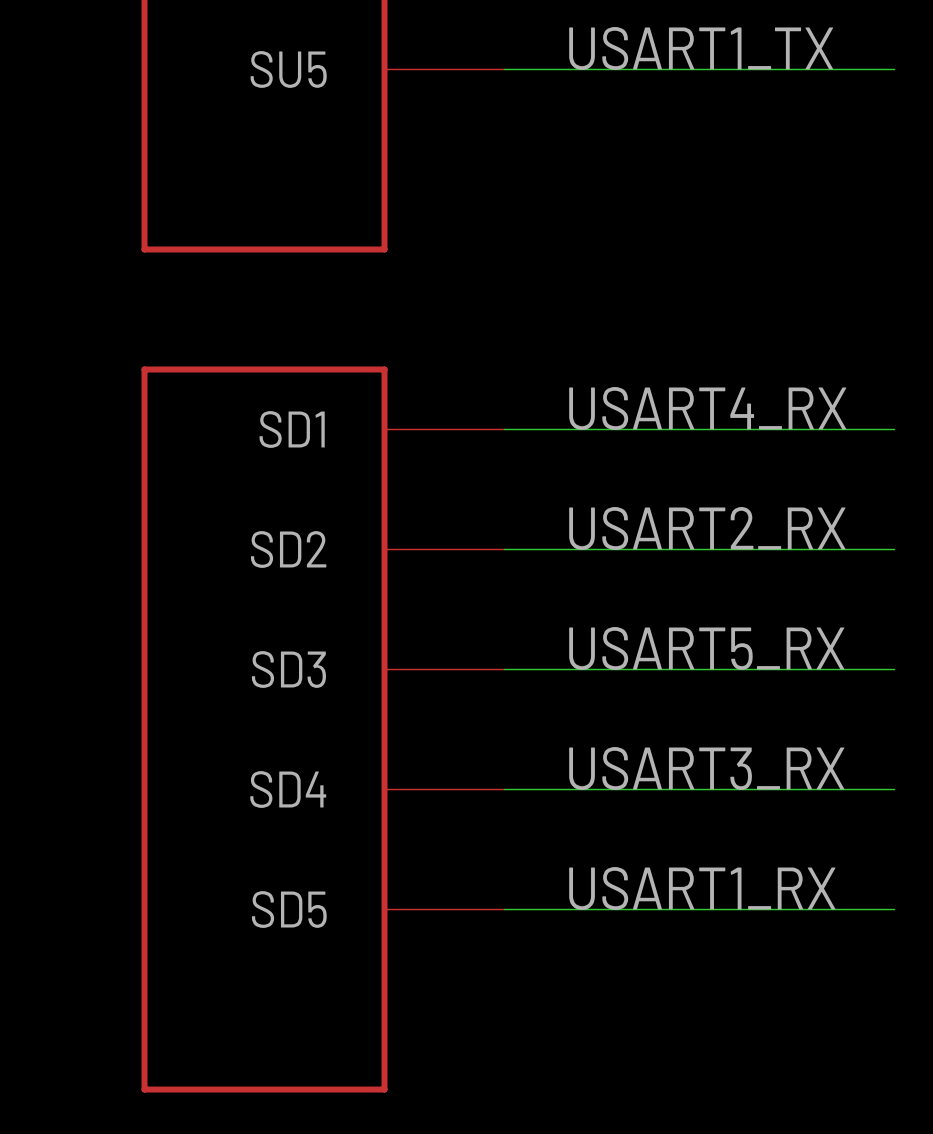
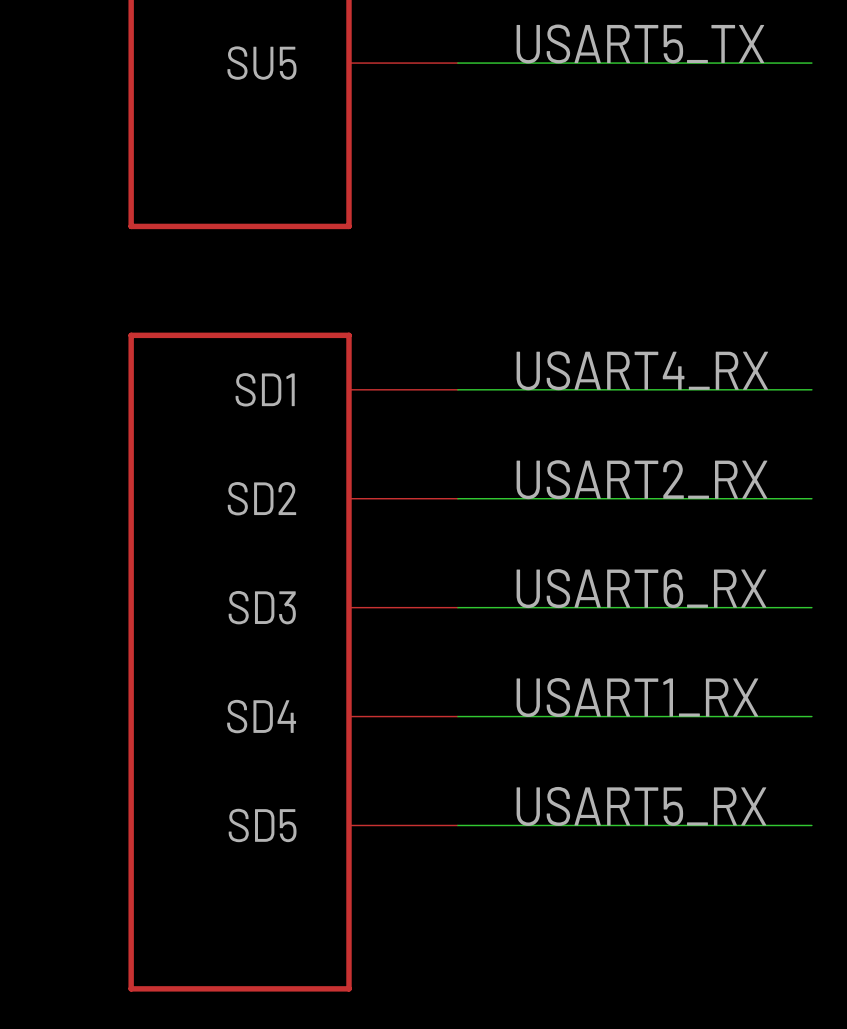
label: USART1_TX (701, 48) -> USART5_TX (640, 43)
label: USART5_RX (706, 648) -> USART6_RX (641, 588)
label: USART3_RX (706, 768) -> USART1_RX (637, 697)
label: USART1_RX (702, 888) -> USART5_RX (641, 806)

